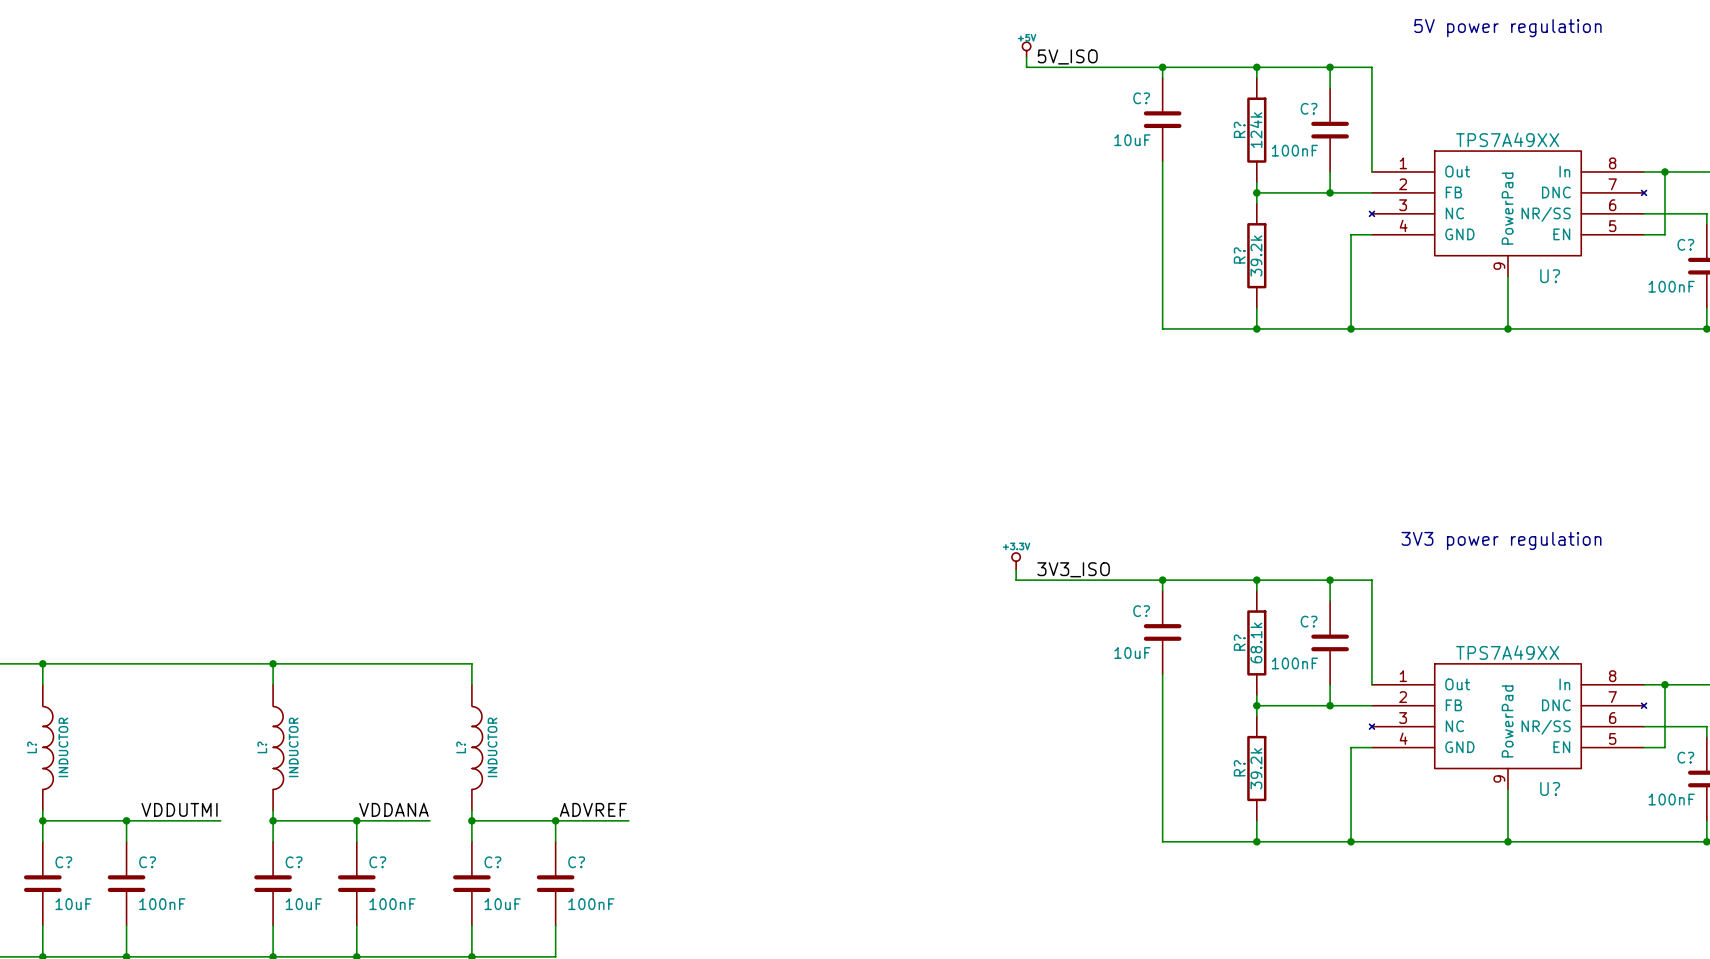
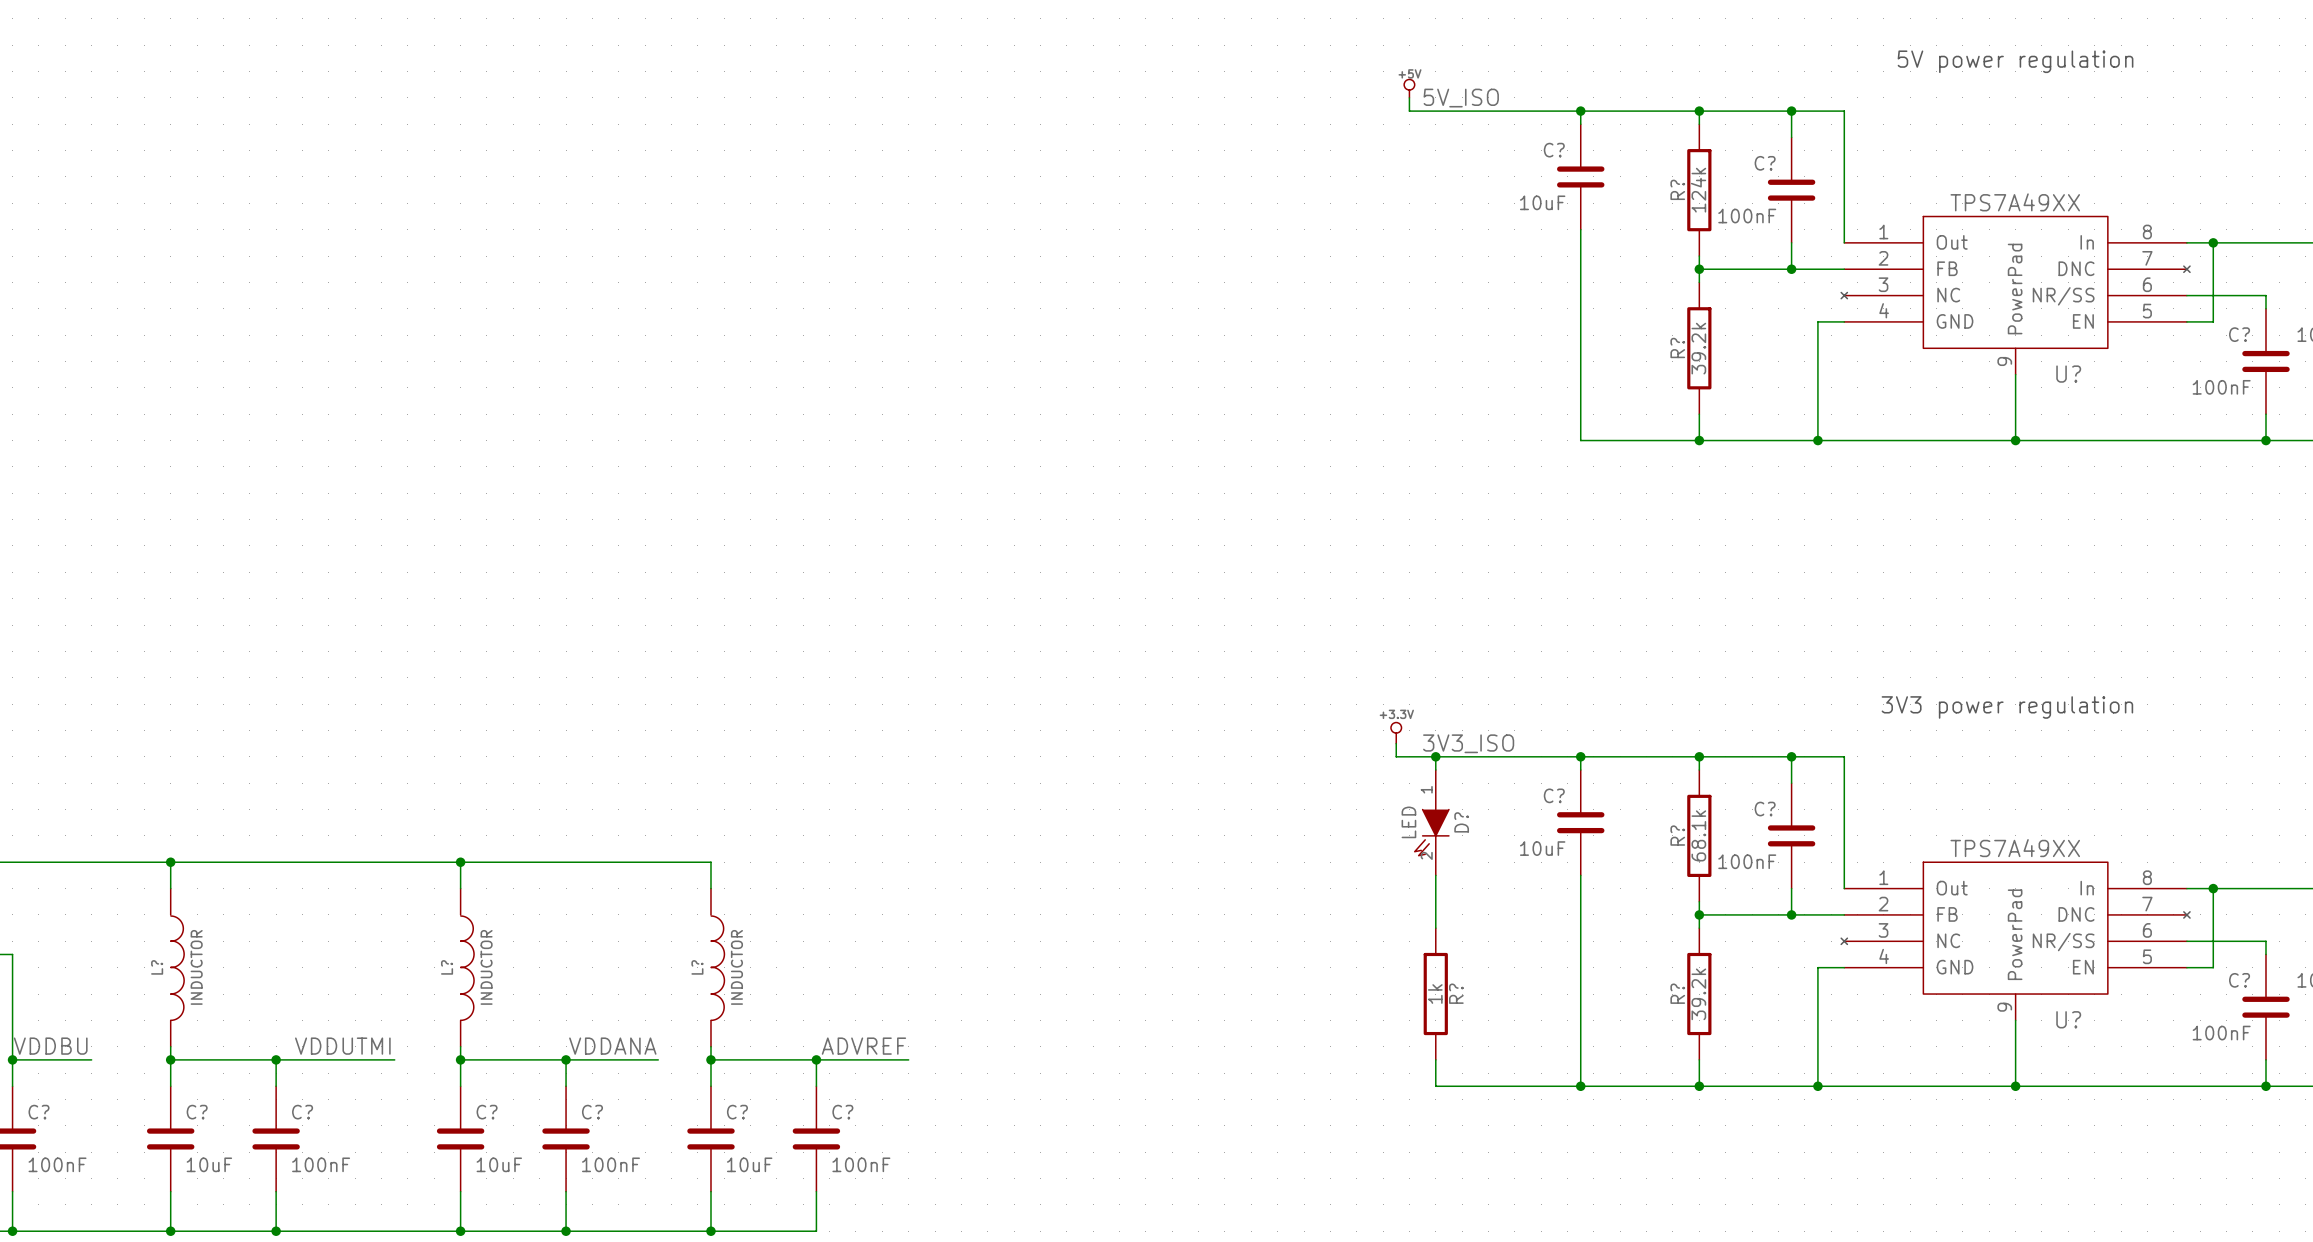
wire: none -> (1435, 756) (1435, 769)
junction: none -> (1435, 756)
D?: none -> LED (1431, 822)
wire: none -> (1435, 875) (1435, 928)
R?: none -> 1k (1435, 994)
wire: none -> (1435, 1059) (1435, 1086) (1580, 1086)
junction: none -> (1580, 1086)

